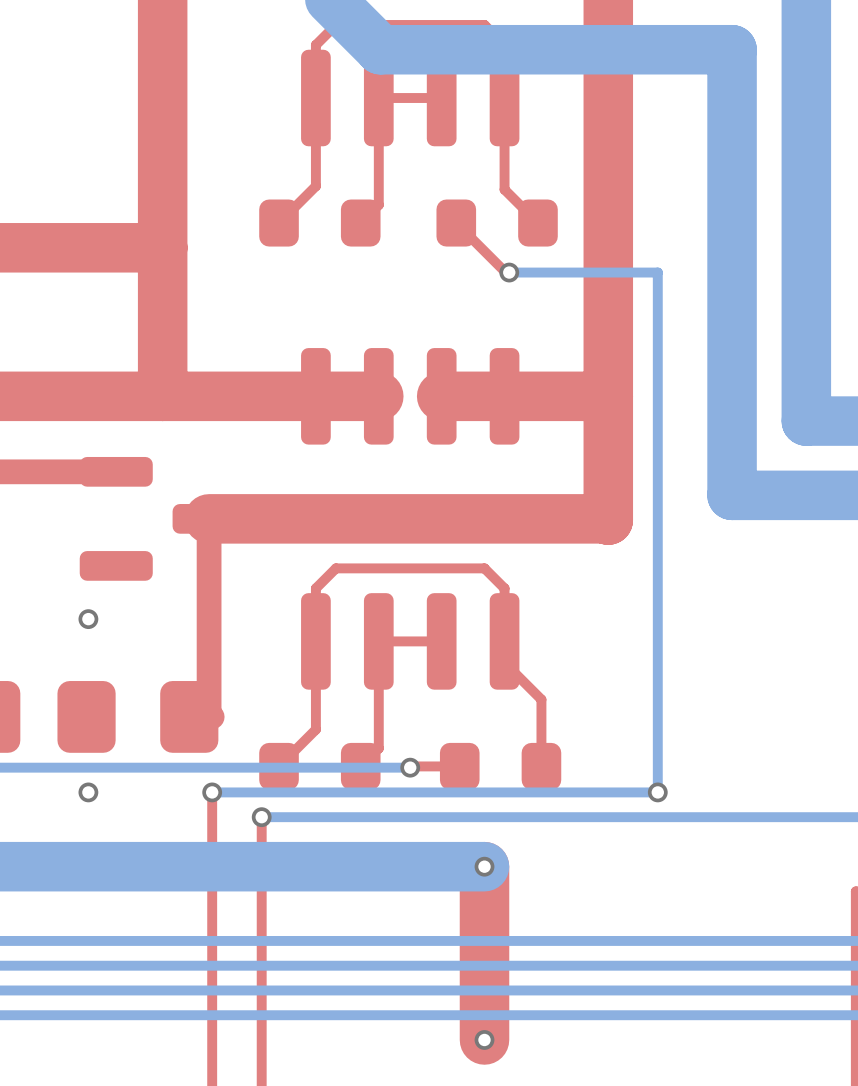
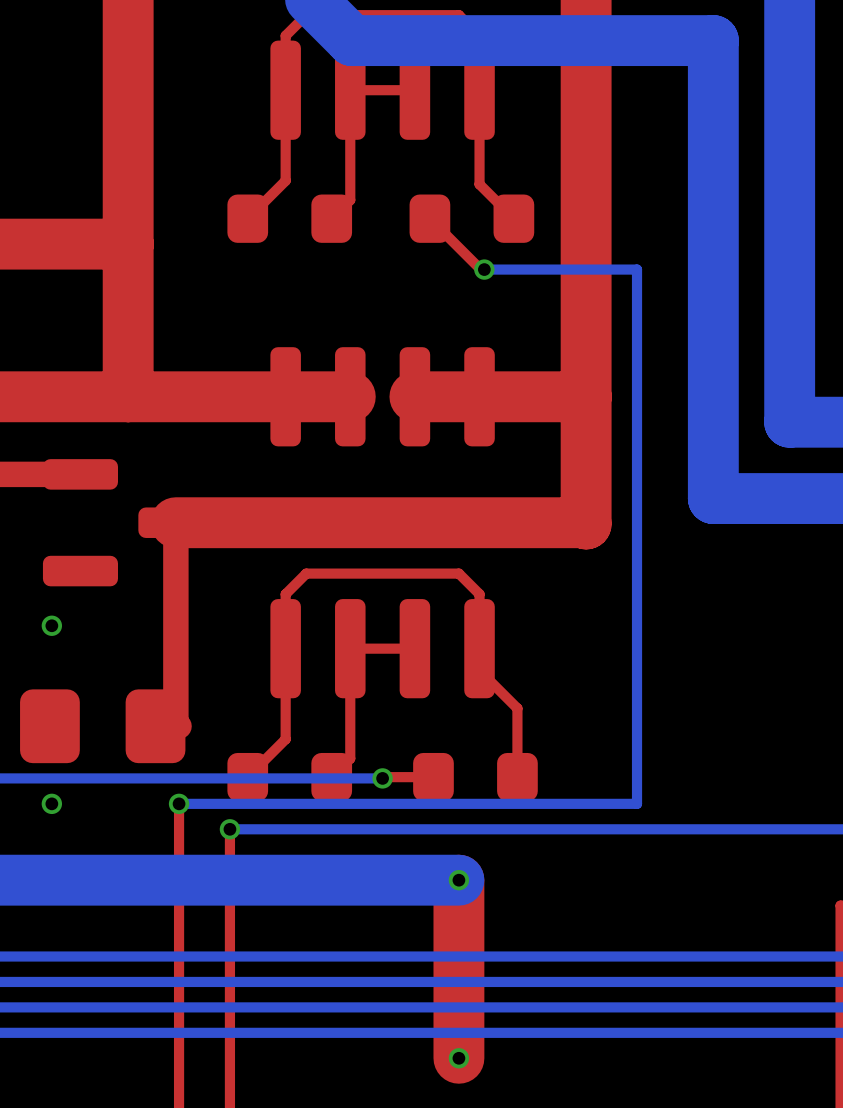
via: (657, 792) -> none

